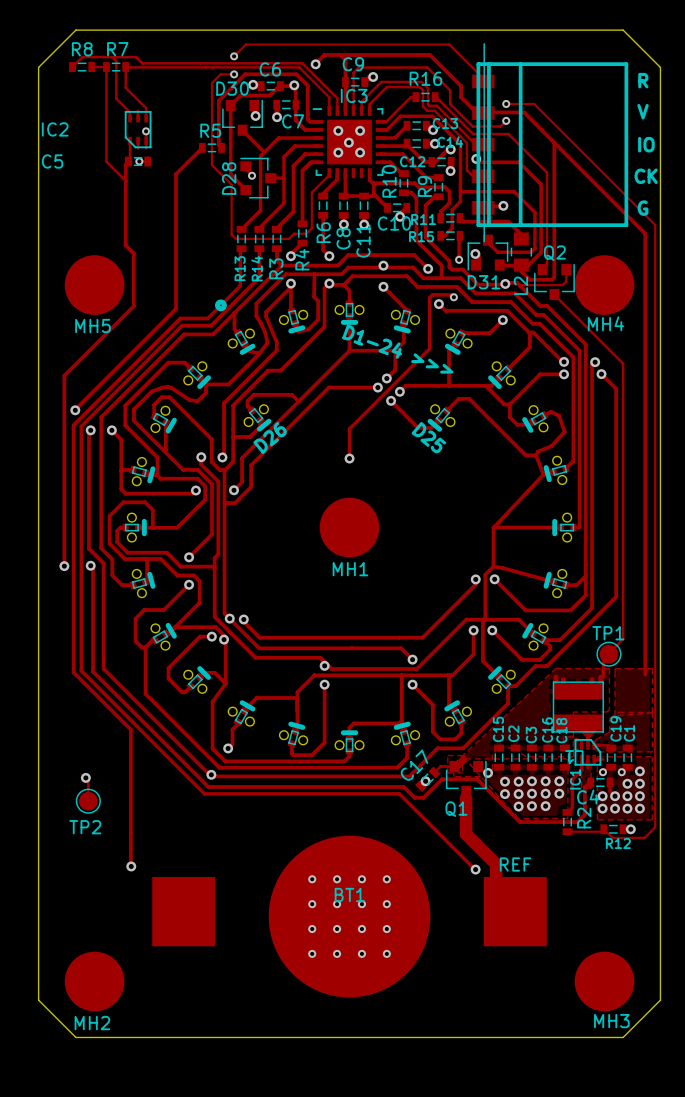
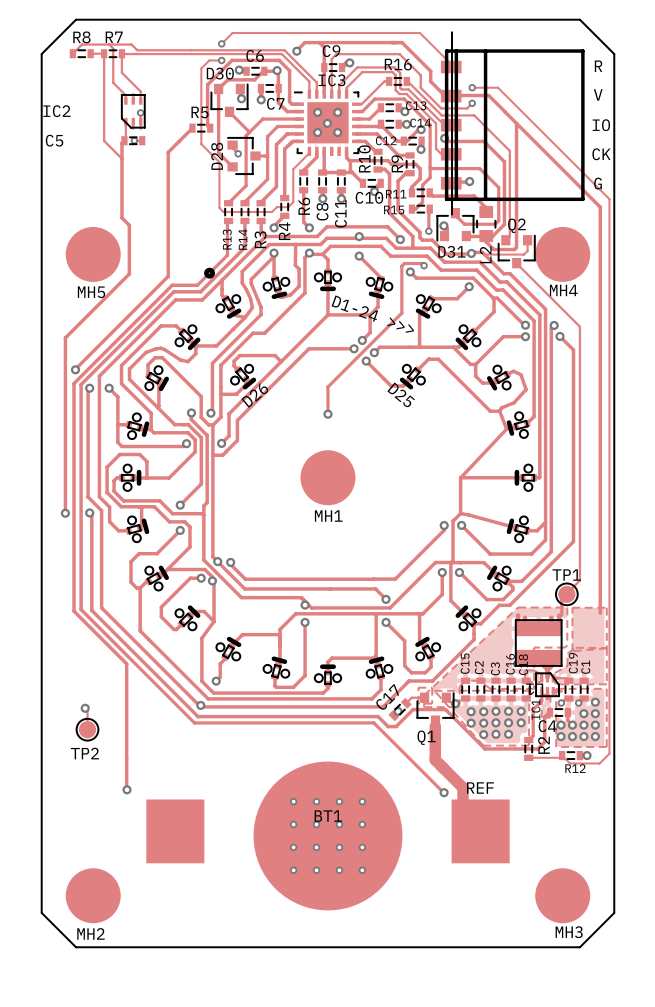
track: (463, 757) (454, 766) (459, 766) (465, 760) -> none

